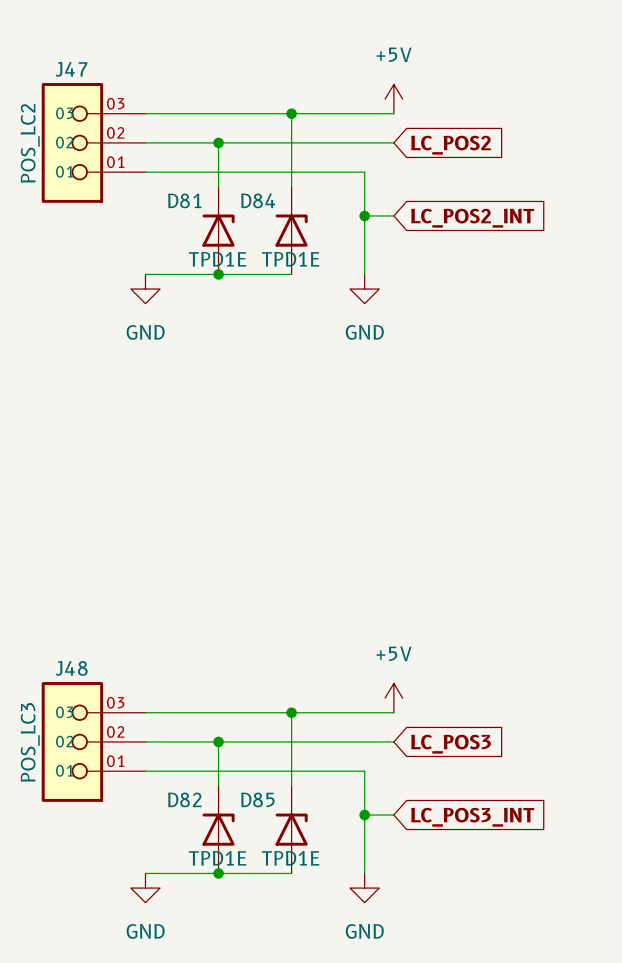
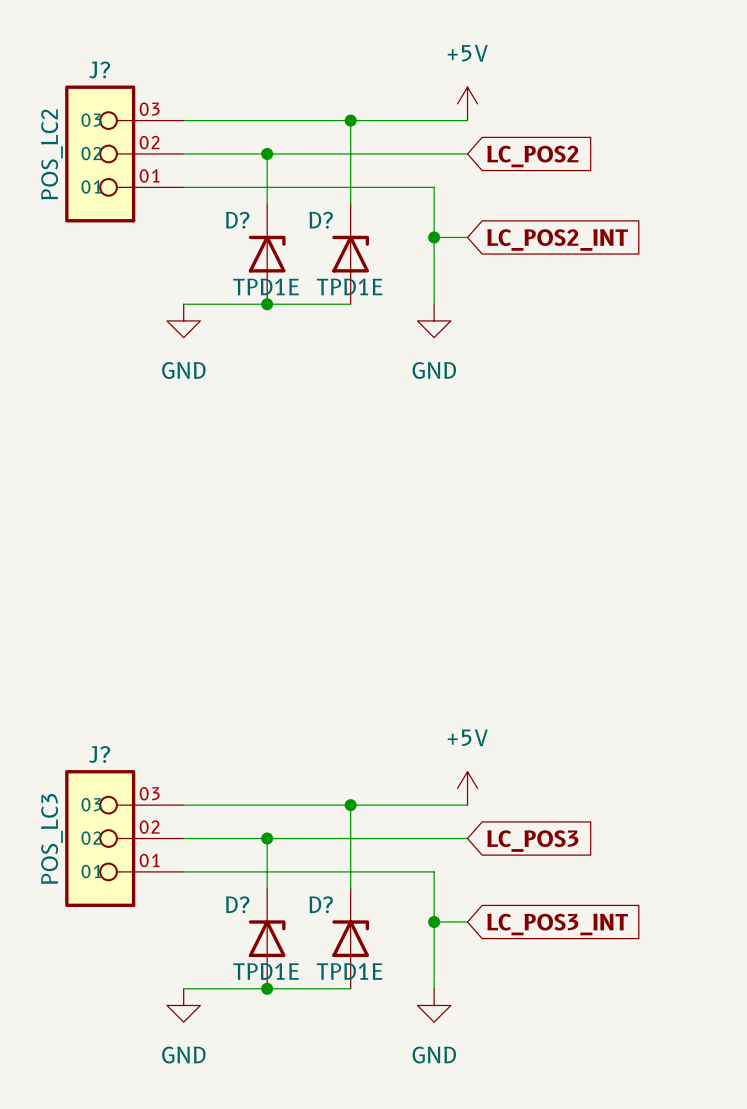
J47 name: J47 (71, 69) -> J? (99, 69)
D81 name: D81 (184, 200) -> D? (237, 220)
D84 name: D84 (258, 200) -> D? (321, 220)
J48 name: J48 (71, 668) -> J? (99, 754)
D82 name: D82 (184, 799) -> D? (237, 904)
D85 name: D85 (257, 799) -> D? (321, 904)

